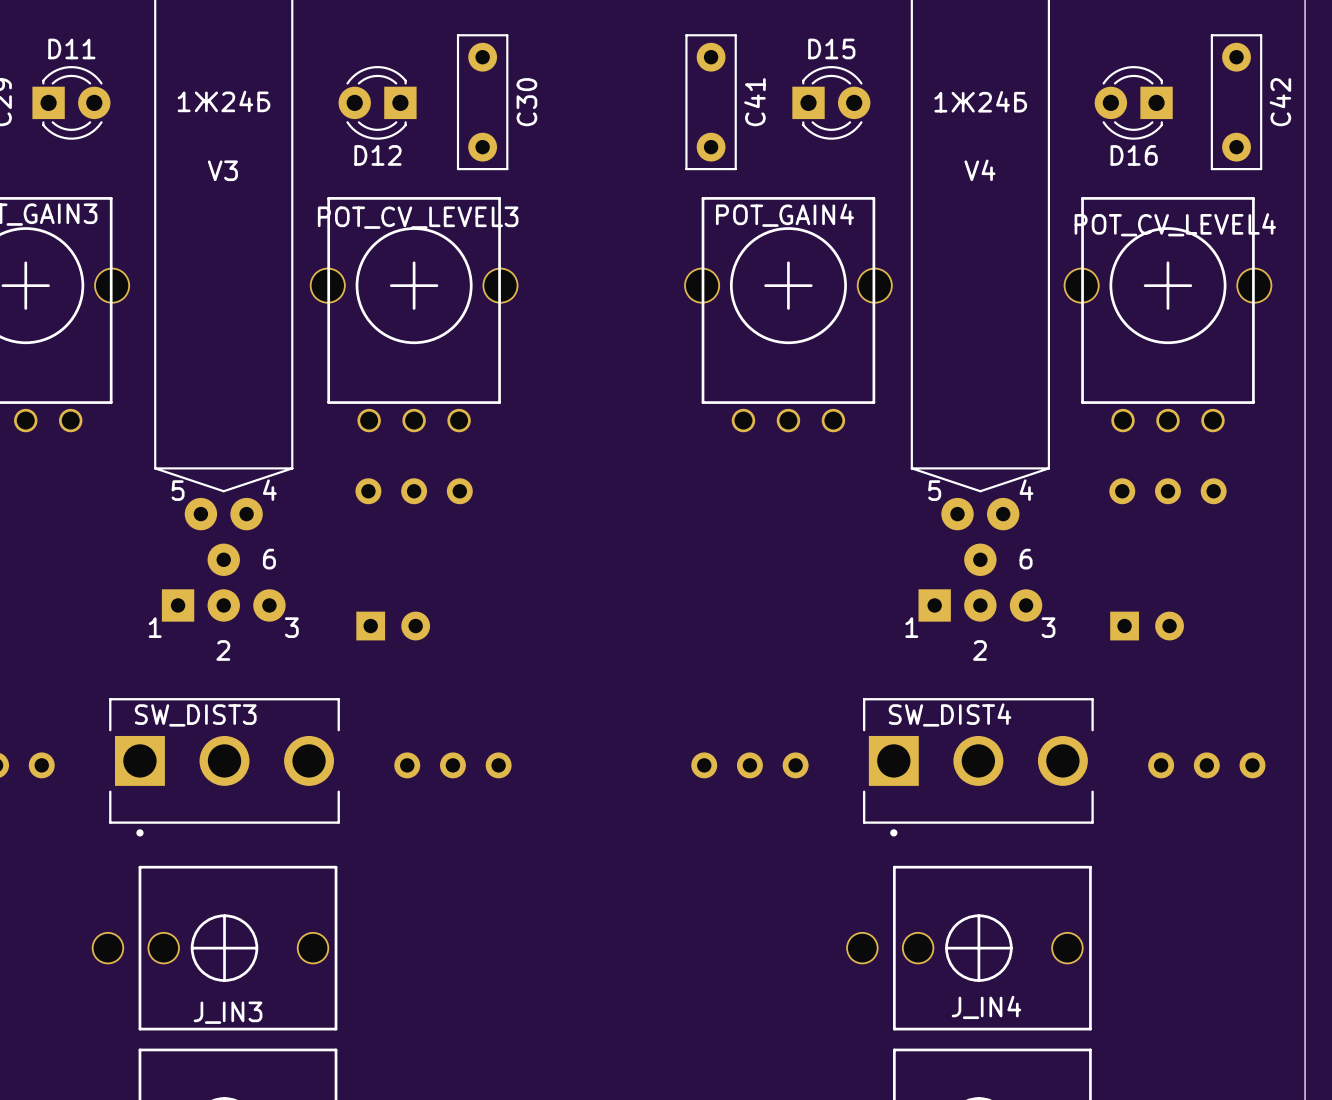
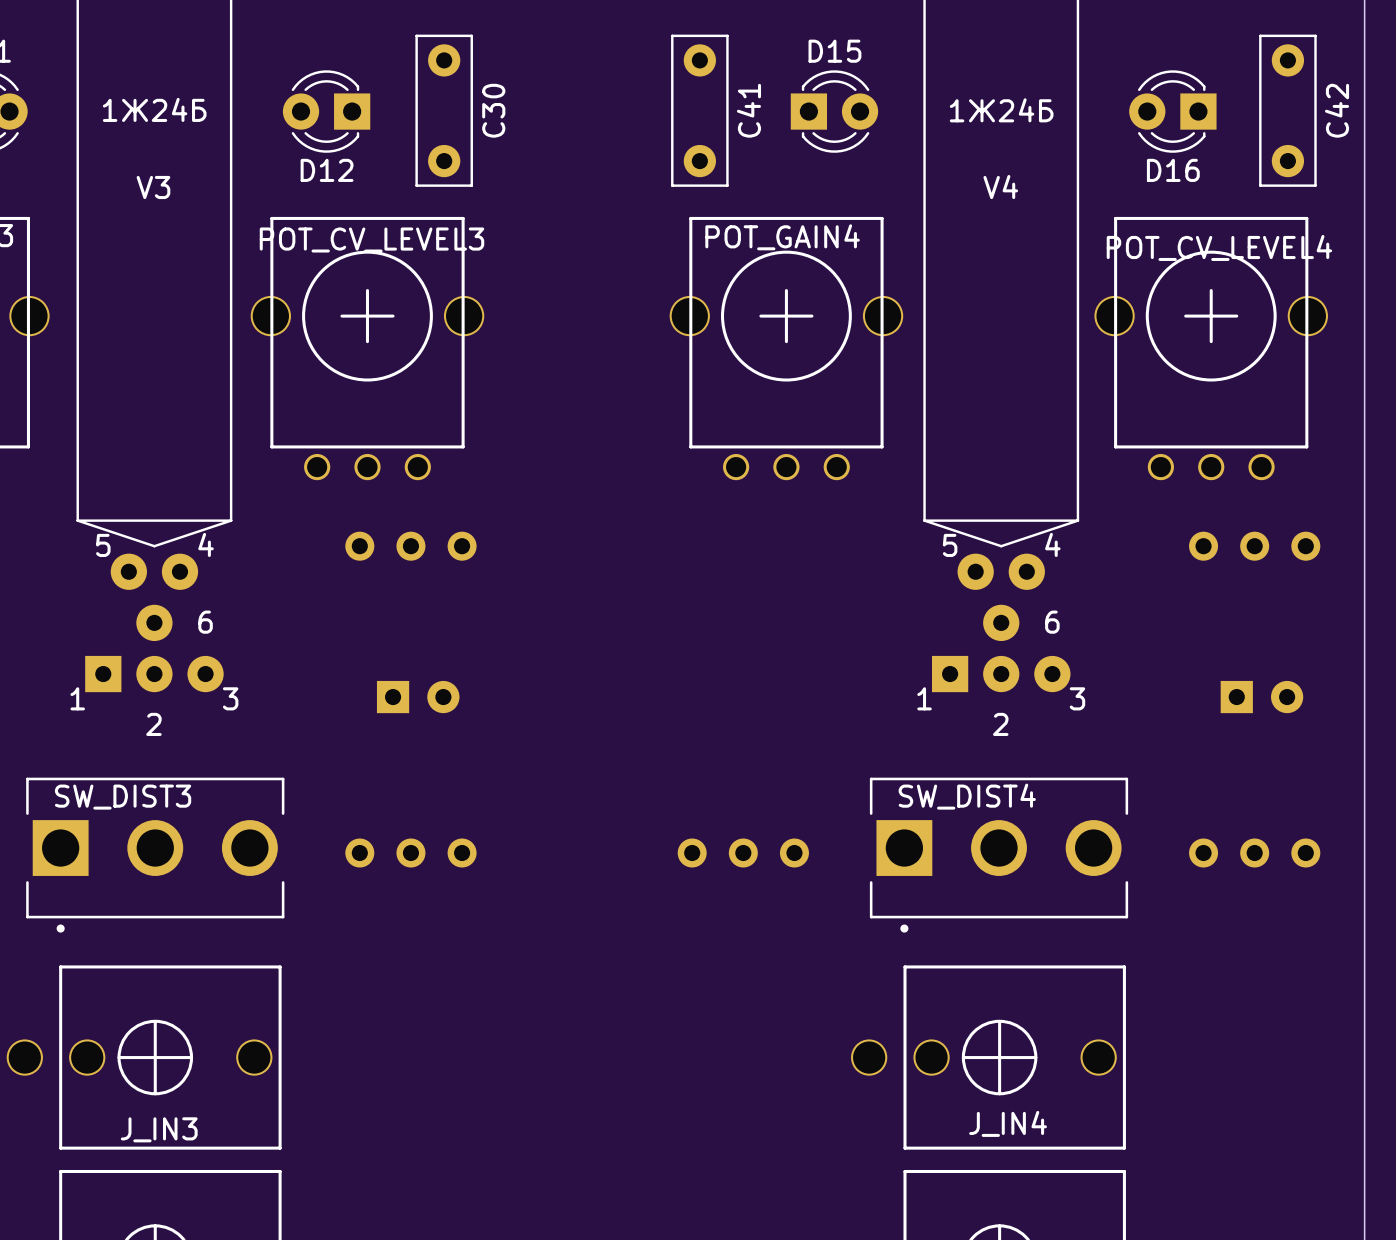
part position: (414, 491) -> (410, 546)
part position: (1167, 491) -> (1254, 546)
part position: (393, 626) -> (418, 697)
part position: (1147, 626) -> (1261, 697)

